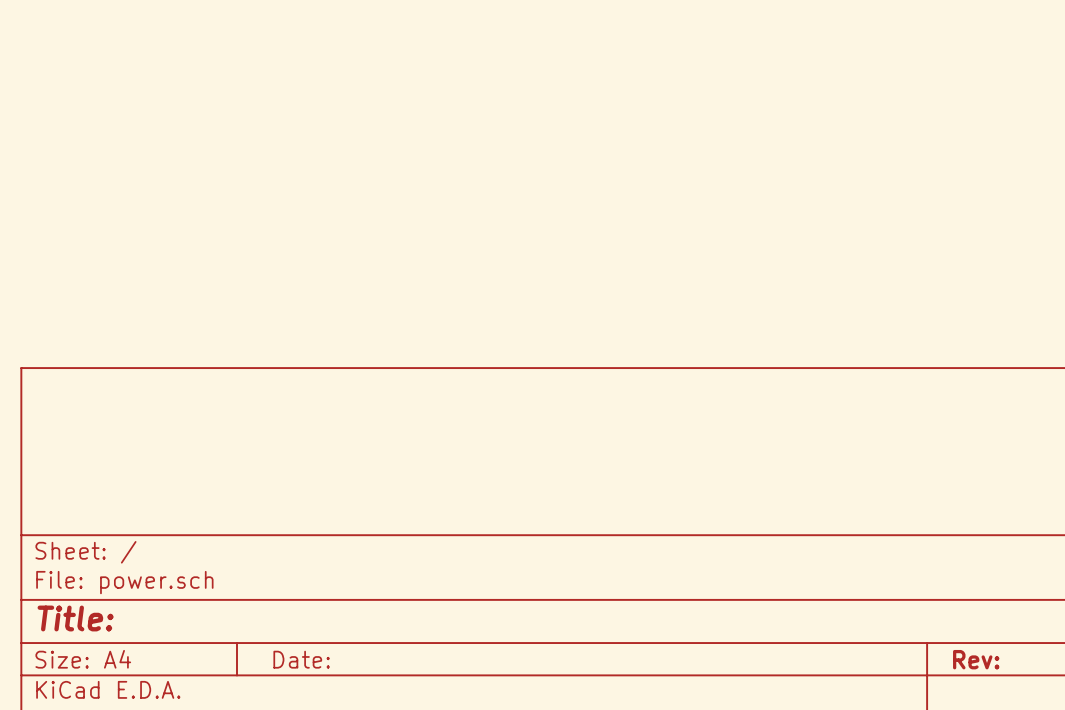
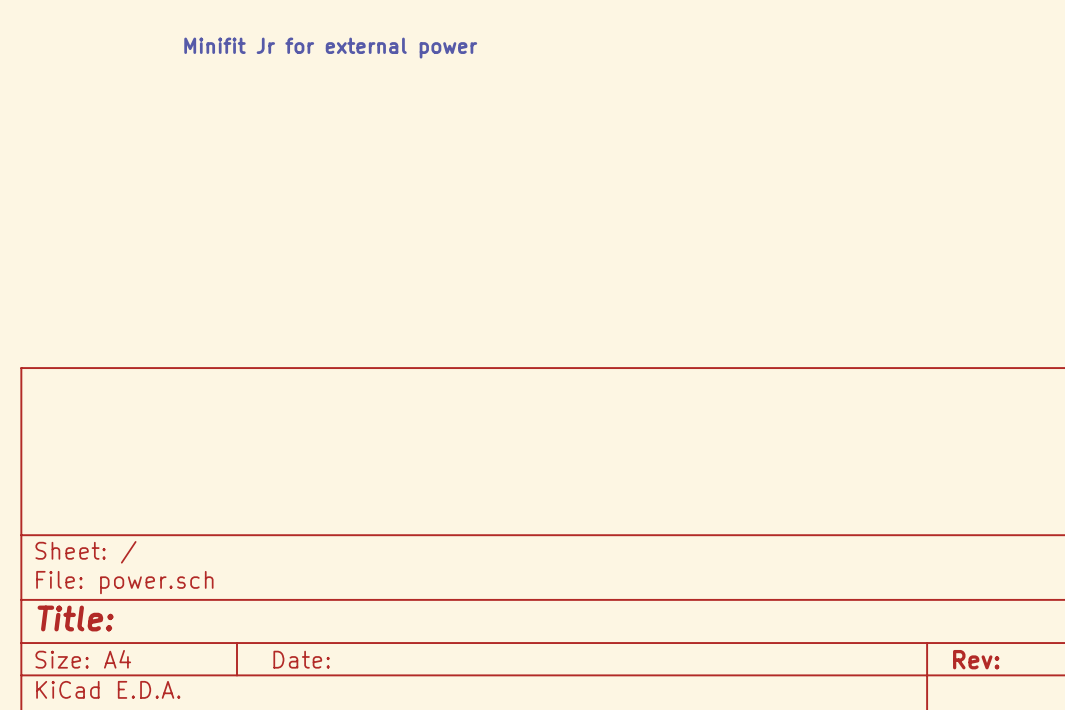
text: none -> Minifit Jr for external power (330, 48)

